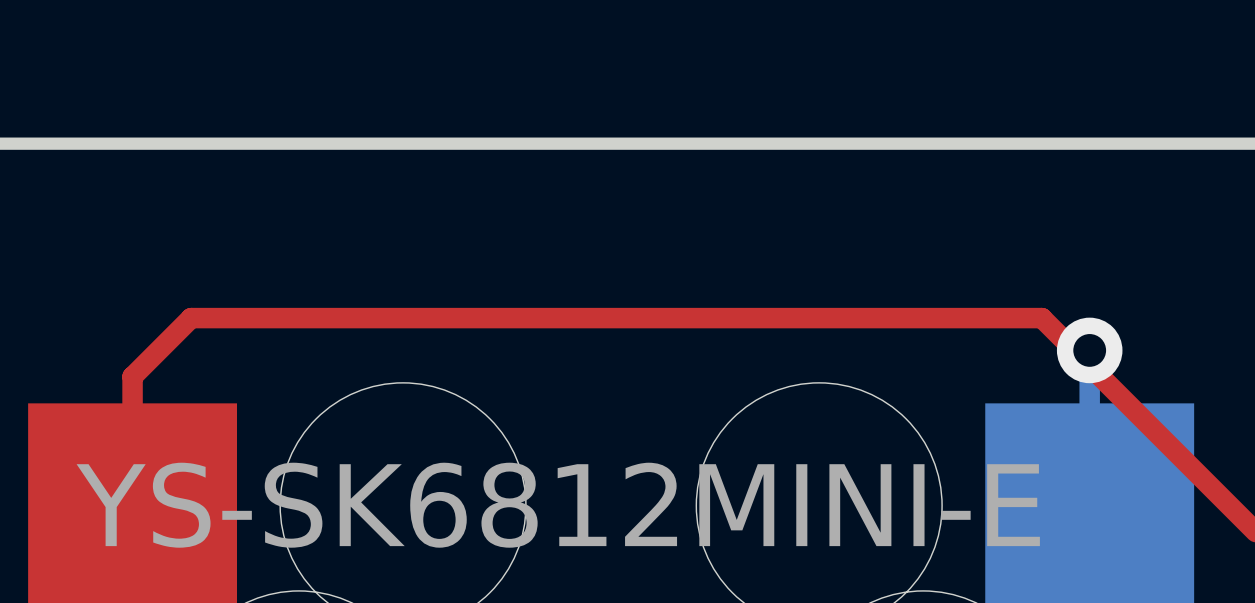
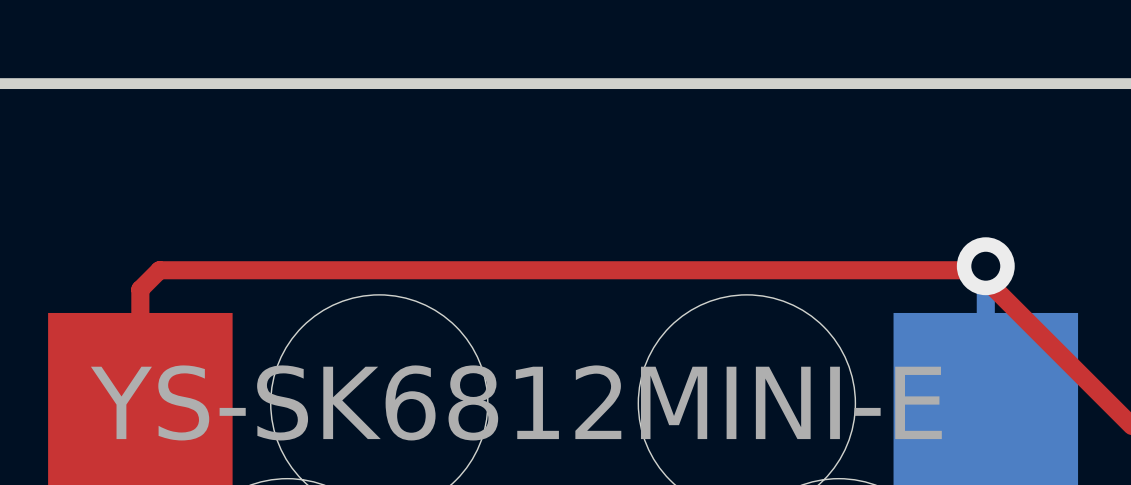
top track: (154, 354) (191, 318) (1041, 318) (1078, 354) -> (159, 270) (976, 270)

